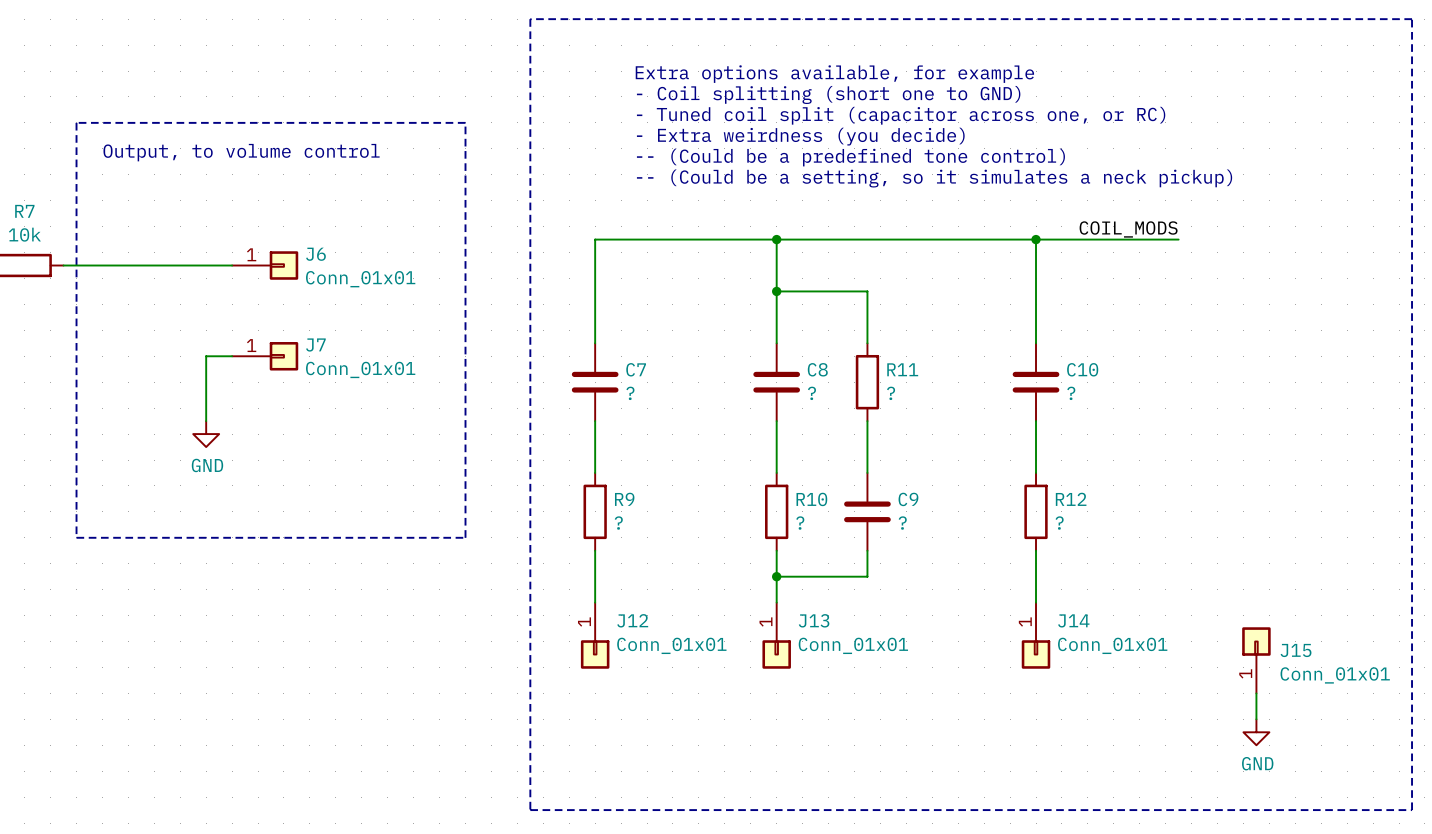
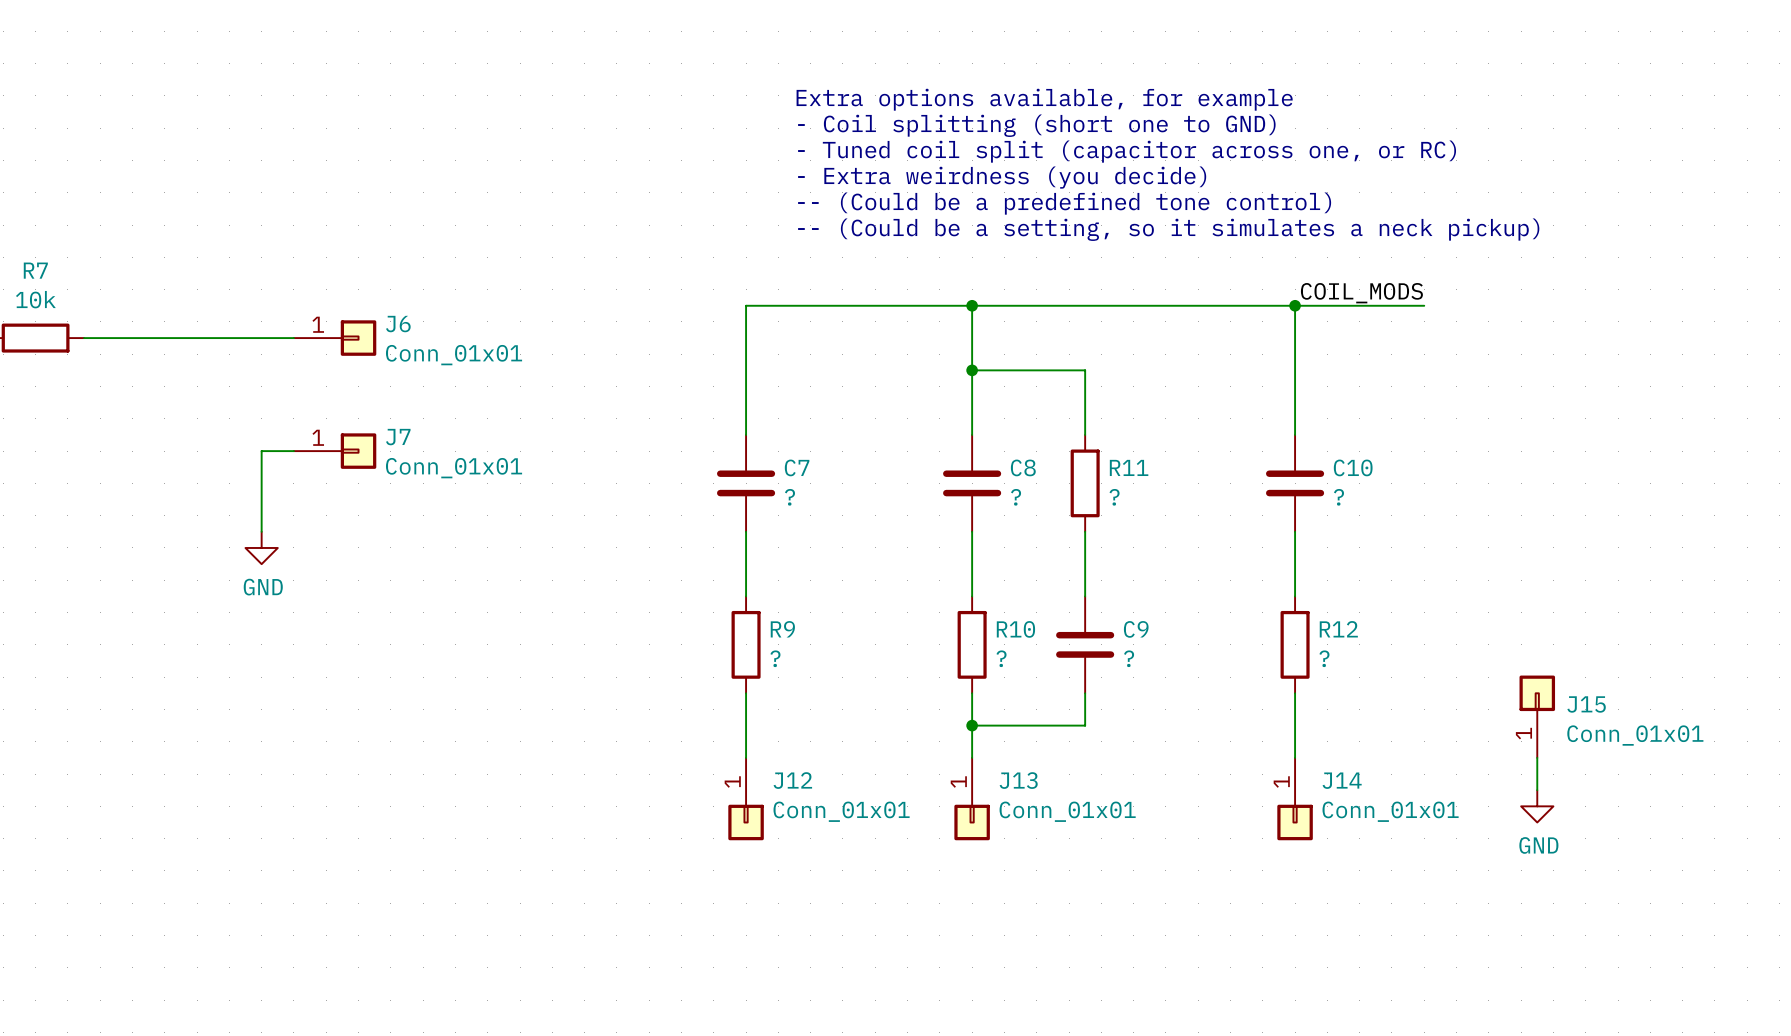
line: (530, 19) (1412, 19) (1412, 810) (530, 810) (530, 19) -> none
line: (76, 122) (465, 122) (465, 537) (76, 537) (76, 122) -> none
text: Output, to volume control (241, 152) -> none
label position: COIL_MODS (1128, 229) -> COIL_MODS (1361, 293)
wire: (1139, 239) (1178, 239) -> none
J15 position: (1256, 660) -> (1537, 716)
wire: (1256, 693) (1256, 719) -> (1537, 757) (1537, 790)
power symbol position: GND (1256, 732) -> GND (1537, 806)

